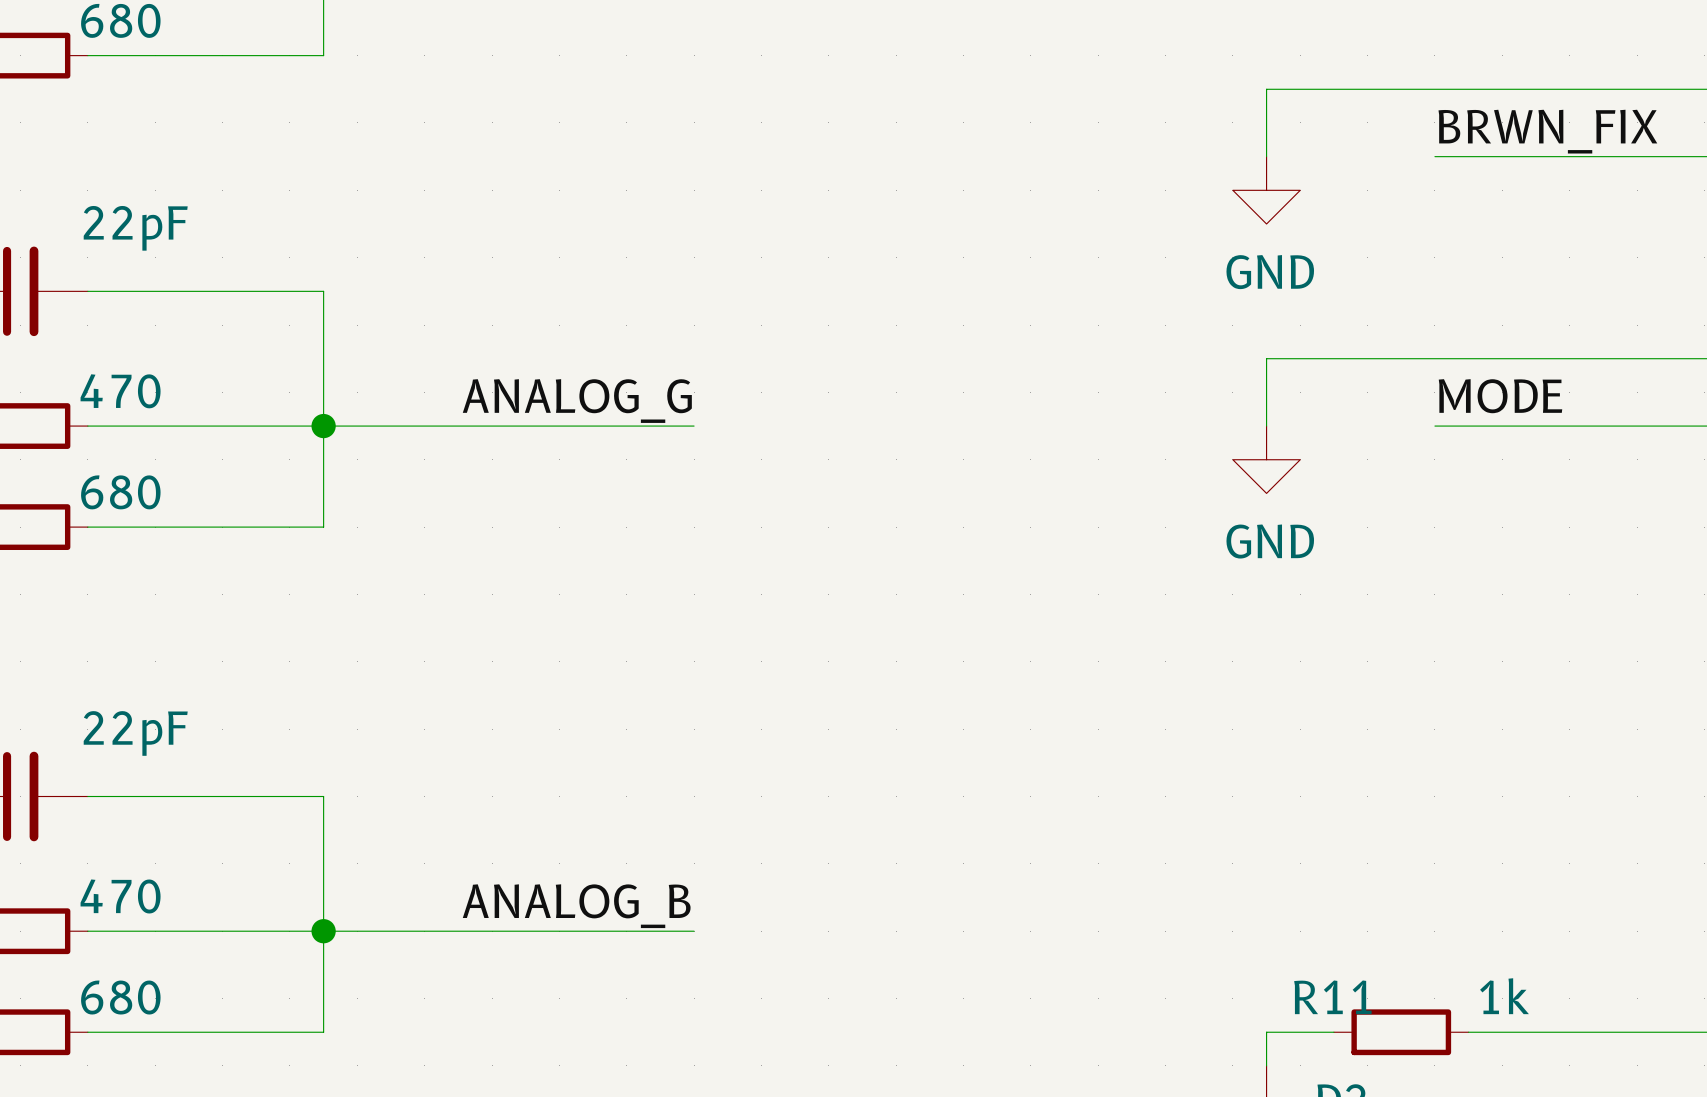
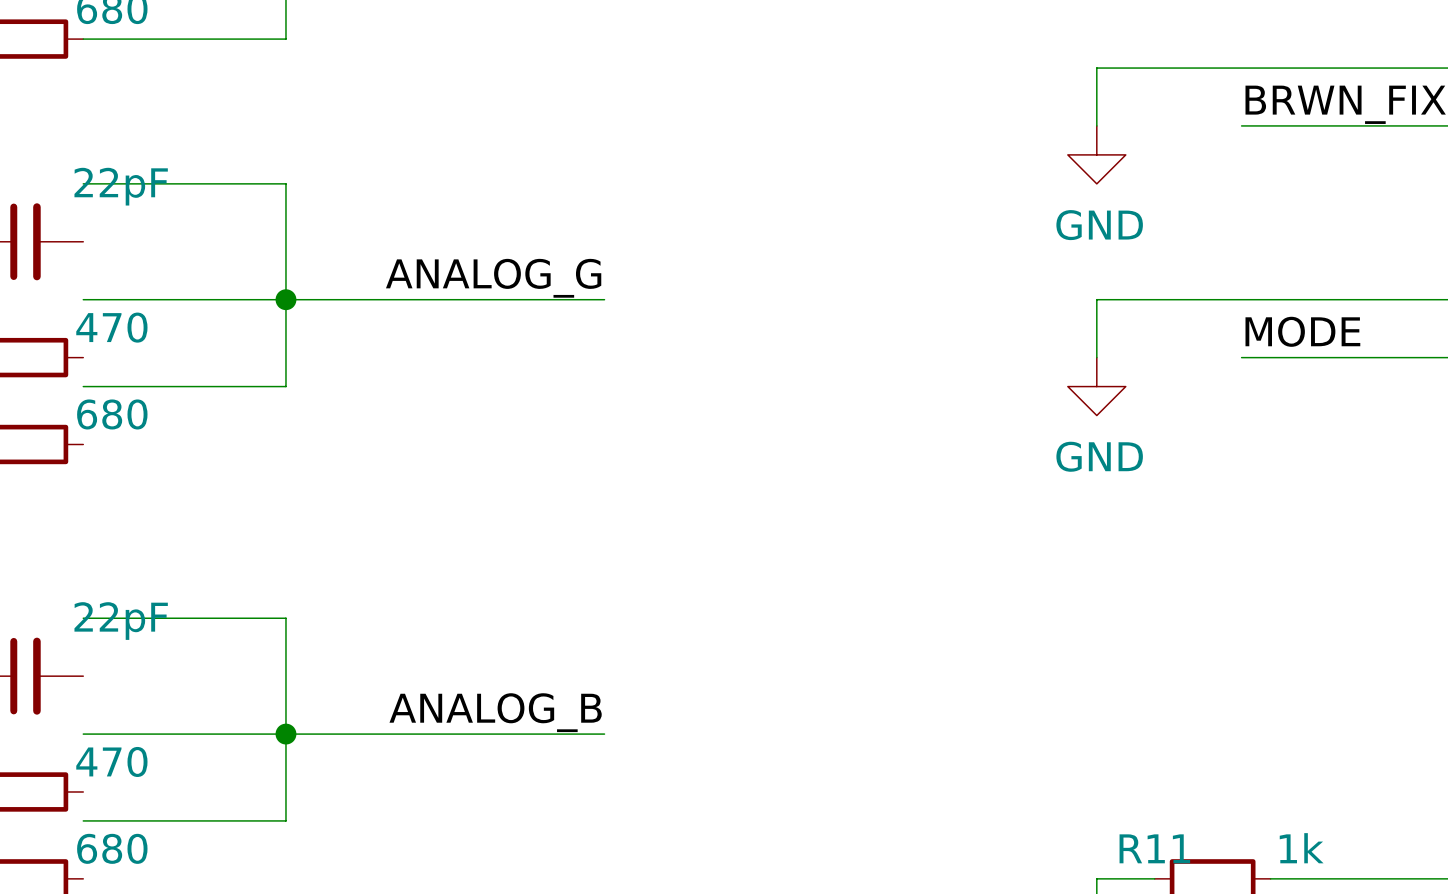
wire: (87, 291) (323, 291) -> (83, 183) (285, 183) (285, 241)
label position: ANALOG_G (577, 401) -> ANALOG_G (493, 278)
wire: (87, 426) (694, 426) -> (83, 299) (604, 299)
junction position: (323, 426) -> (285, 299)
wire: (323, 459) (323, 527) (87, 527) -> (285, 386) (83, 386)
wire: (87, 796) (323, 796) -> (83, 618) (285, 618) (285, 676)
label position: ANALOG_B (576, 906) -> ANALOG_B (495, 712)
wire: (87, 931) (694, 931) -> (83, 734) (604, 734)
junction position: (323, 931) -> (285, 734)
wire: (323, 964) (323, 1032) (87, 1032) -> (285, 820) (83, 820)

